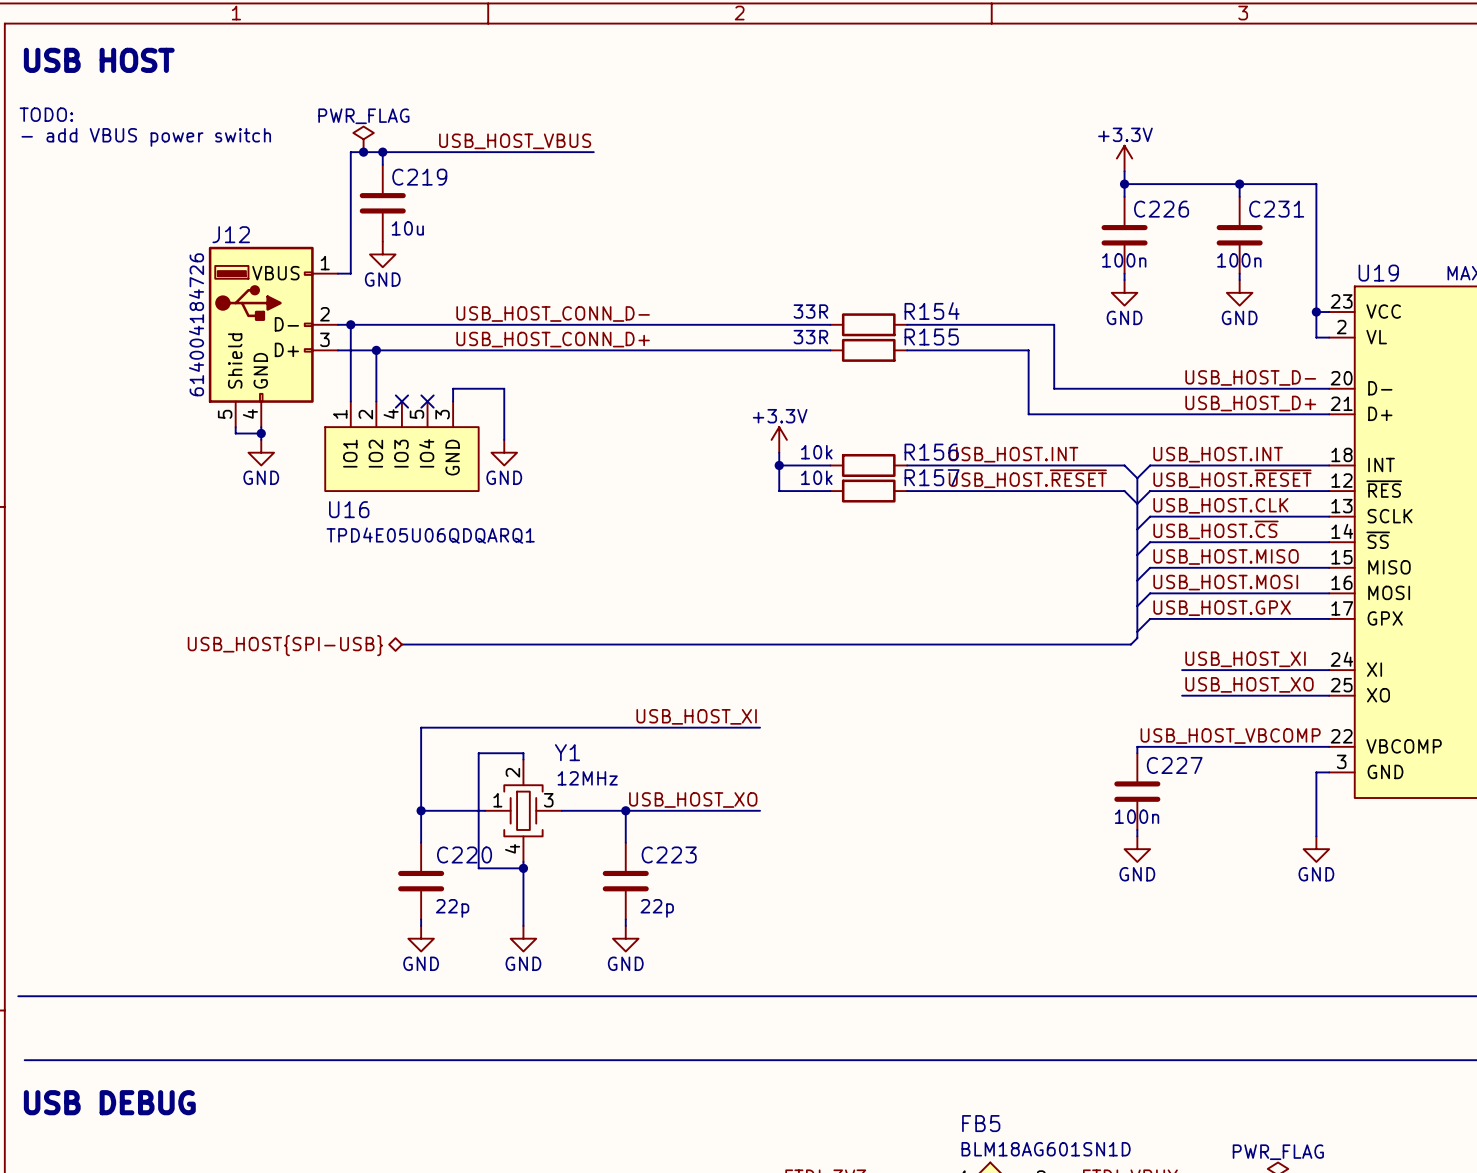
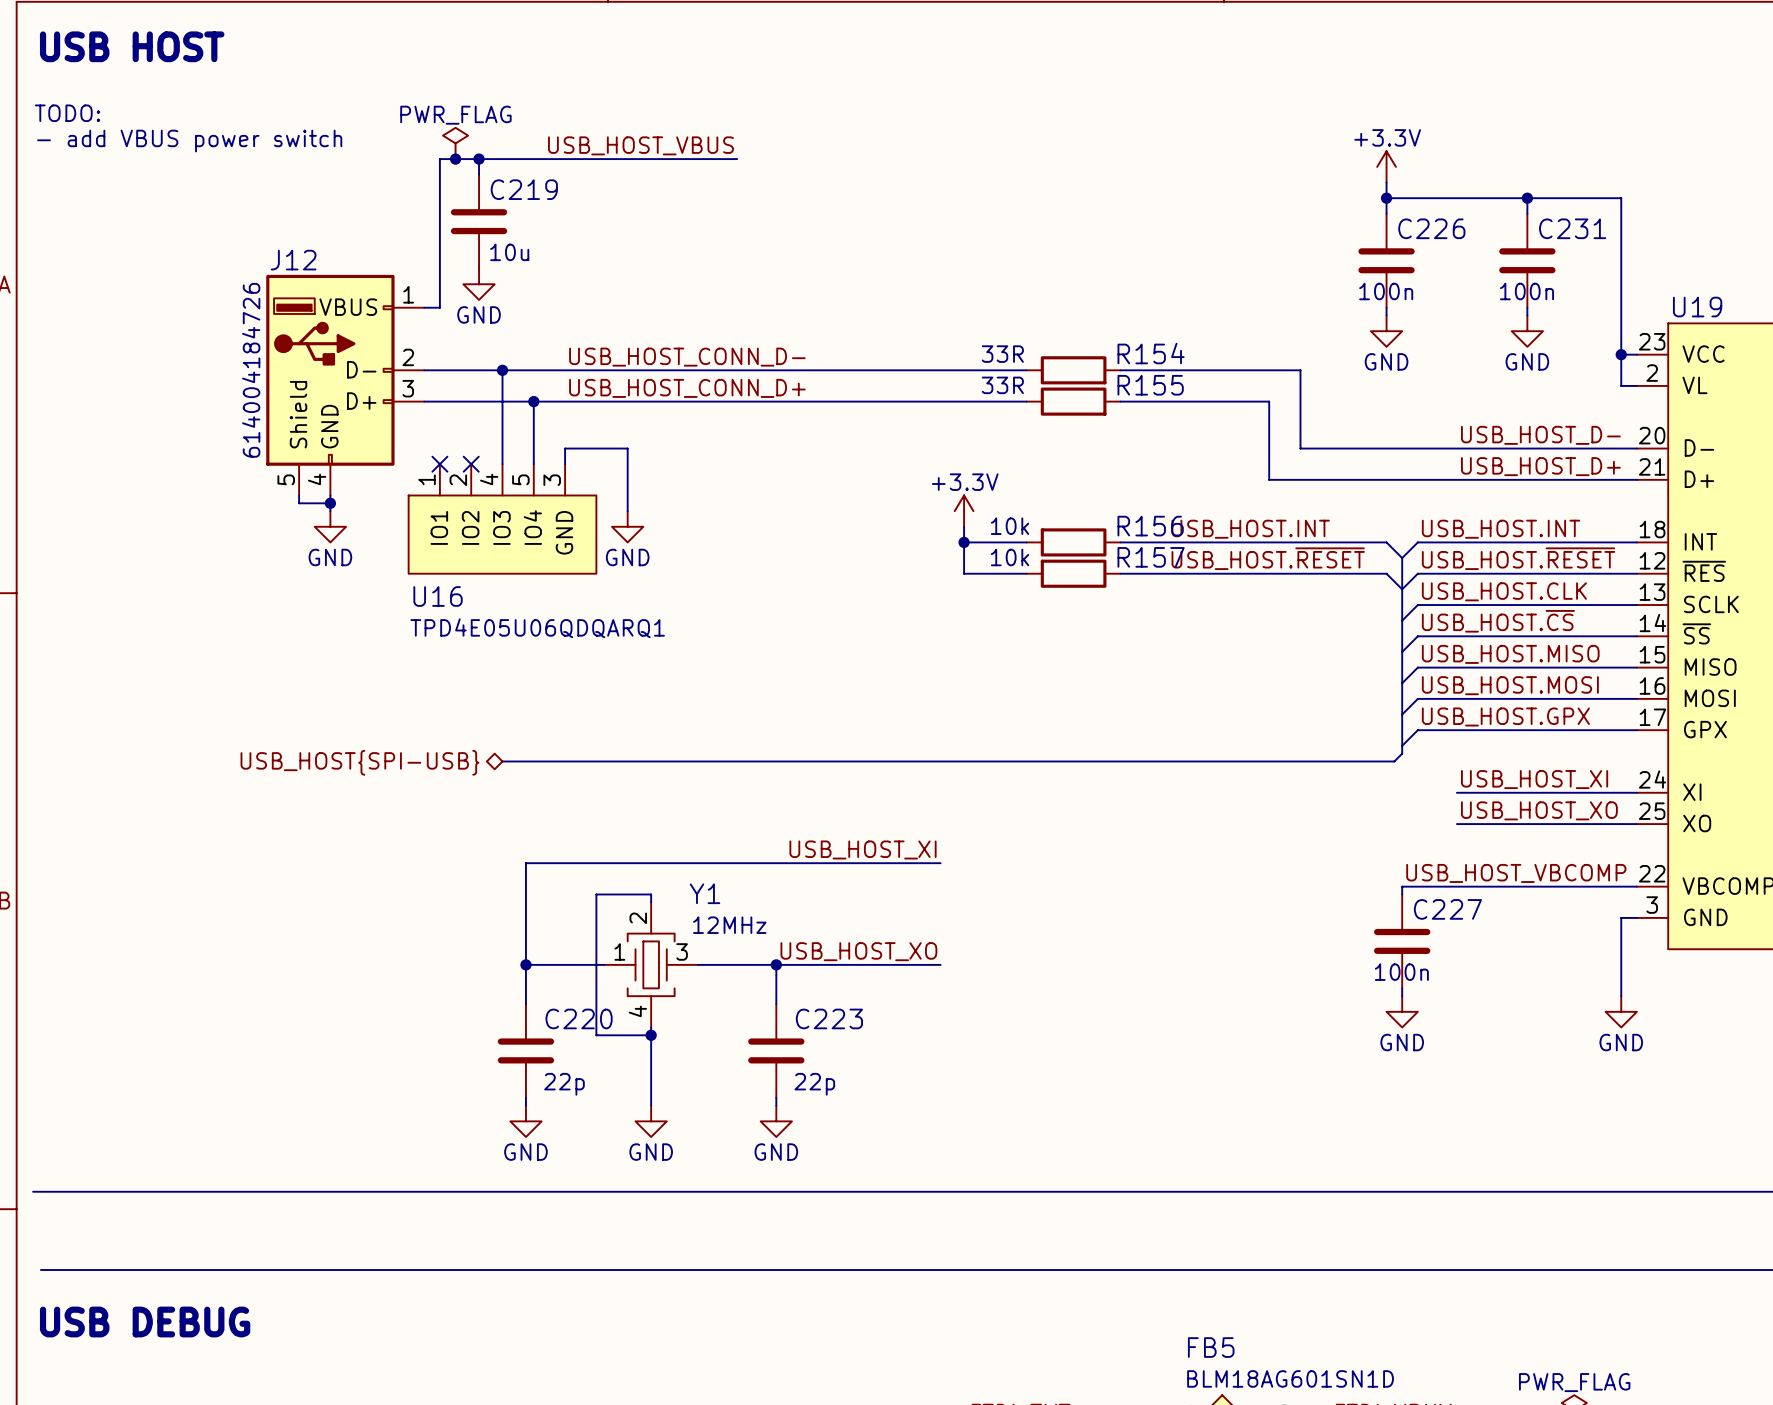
wire: (350, 324) (350, 401) -> (502, 370) (502, 464)
junction: (350, 324) -> none
junction: none -> (502, 370)
wire: (376, 350) (376, 401) -> (533, 401) (533, 464)
junction: (376, 350) -> none
junction: none -> (533, 401)
no-connect mark: none -> (439, 464)
no-connect mark: none -> (471, 464)
no-connect mark: (401, 401) -> none
no-connect mark: (427, 401) -> none

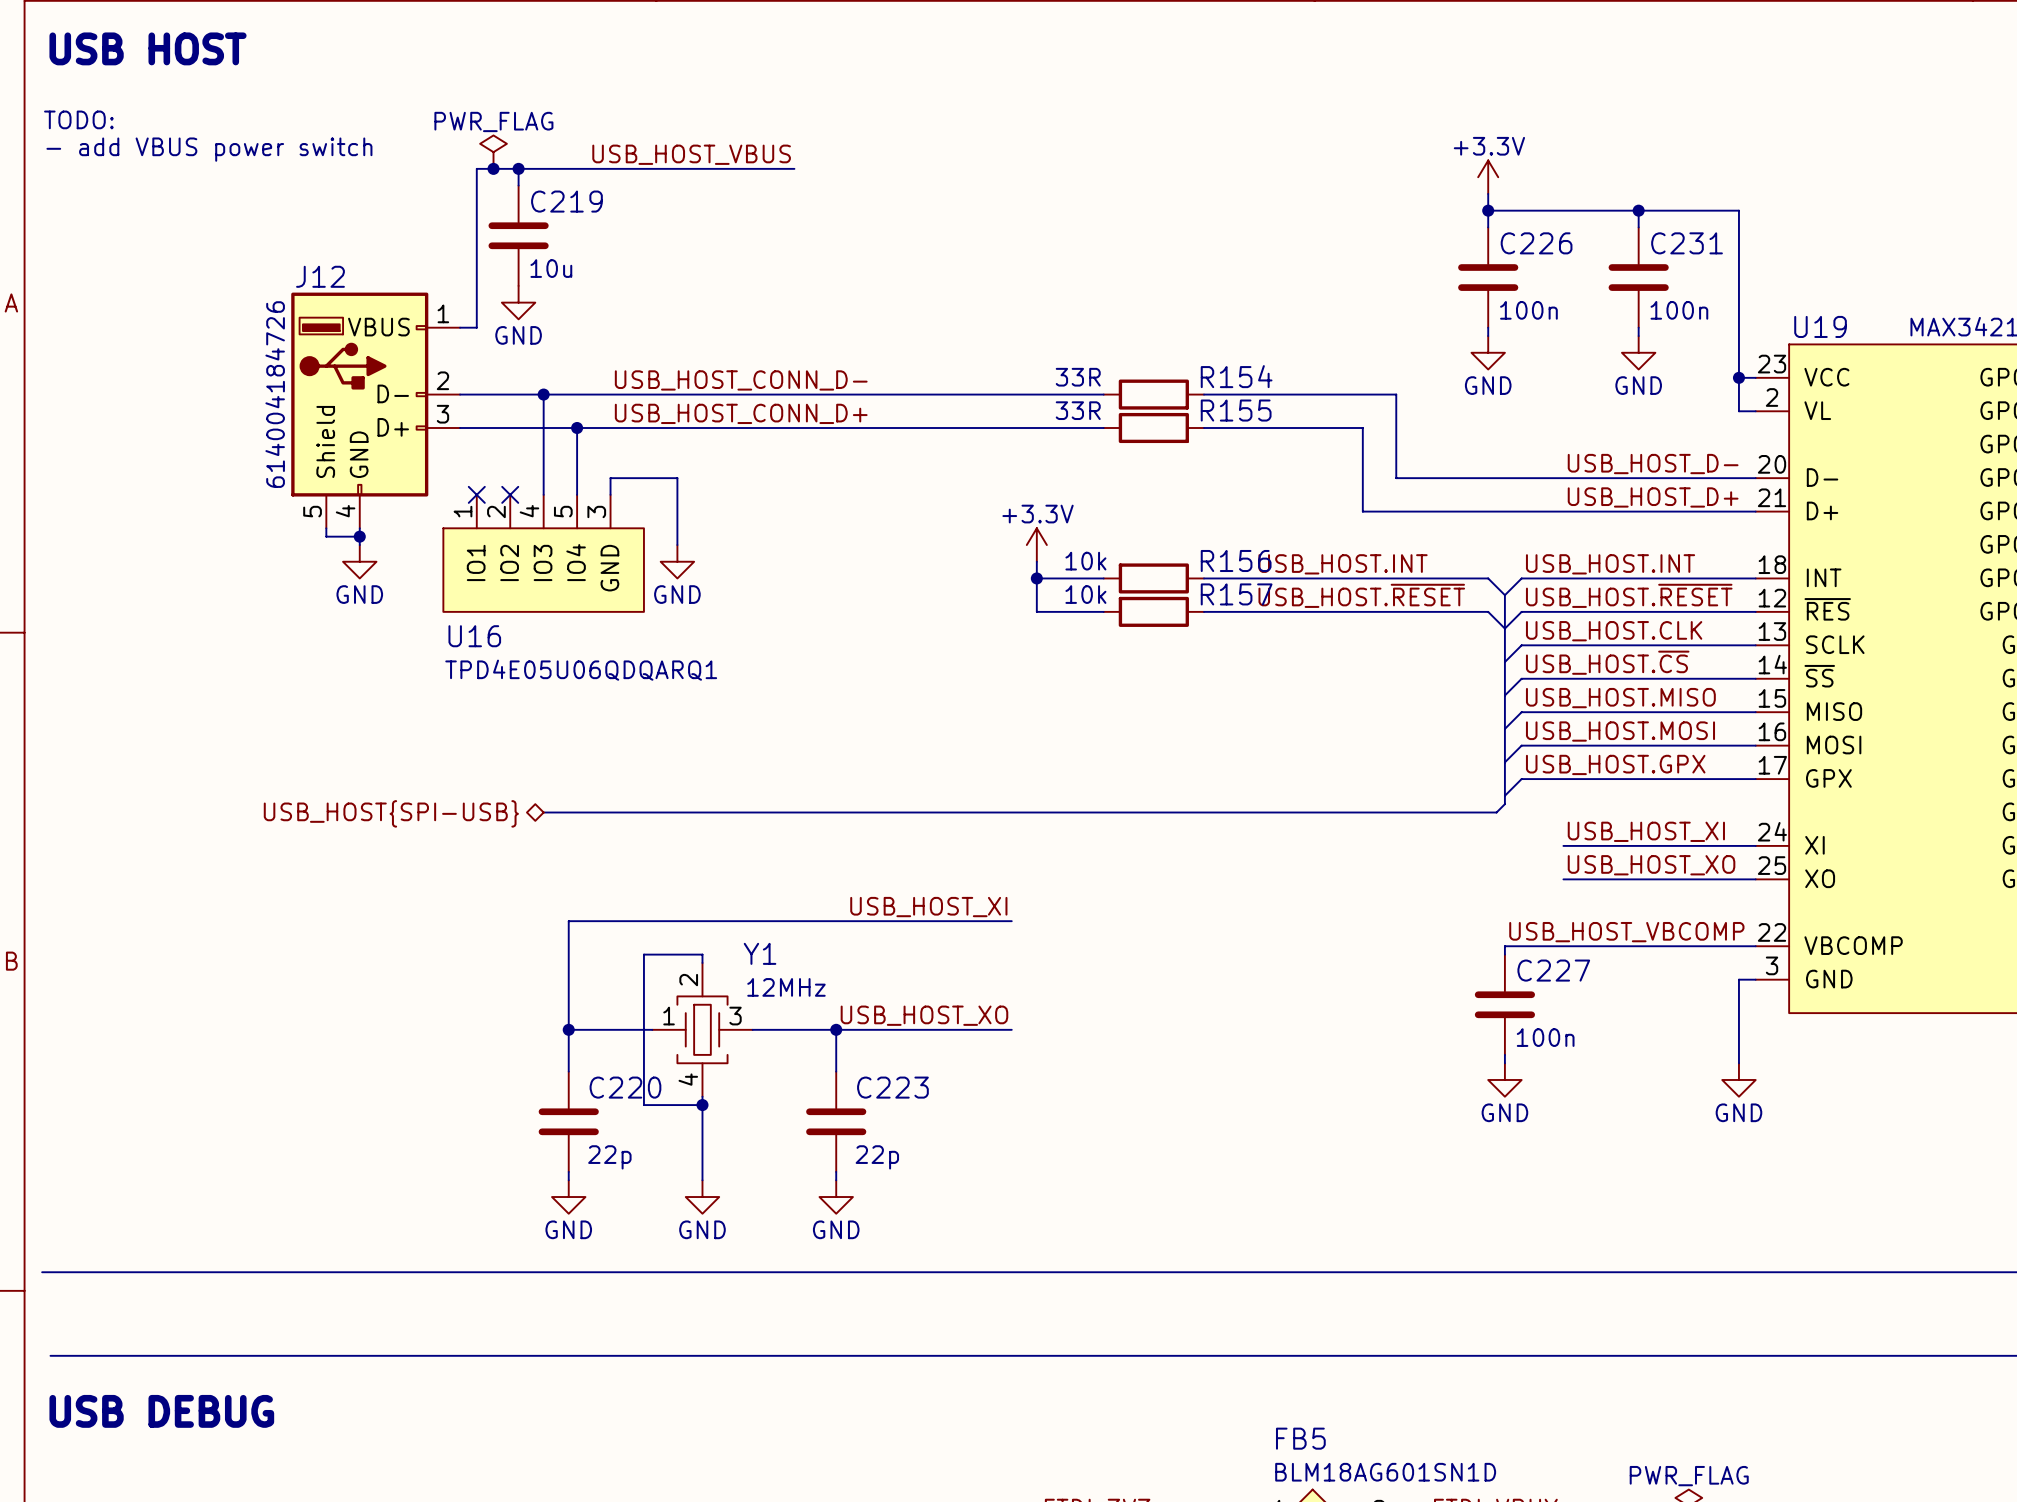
C226 text position: 100n (1386, 291) -> 100n (1528, 310)
C231 text position: 100n (1527, 291) -> 100n (1679, 310)
C227 text position: 100n (1401, 972) -> 100n (1545, 1037)

